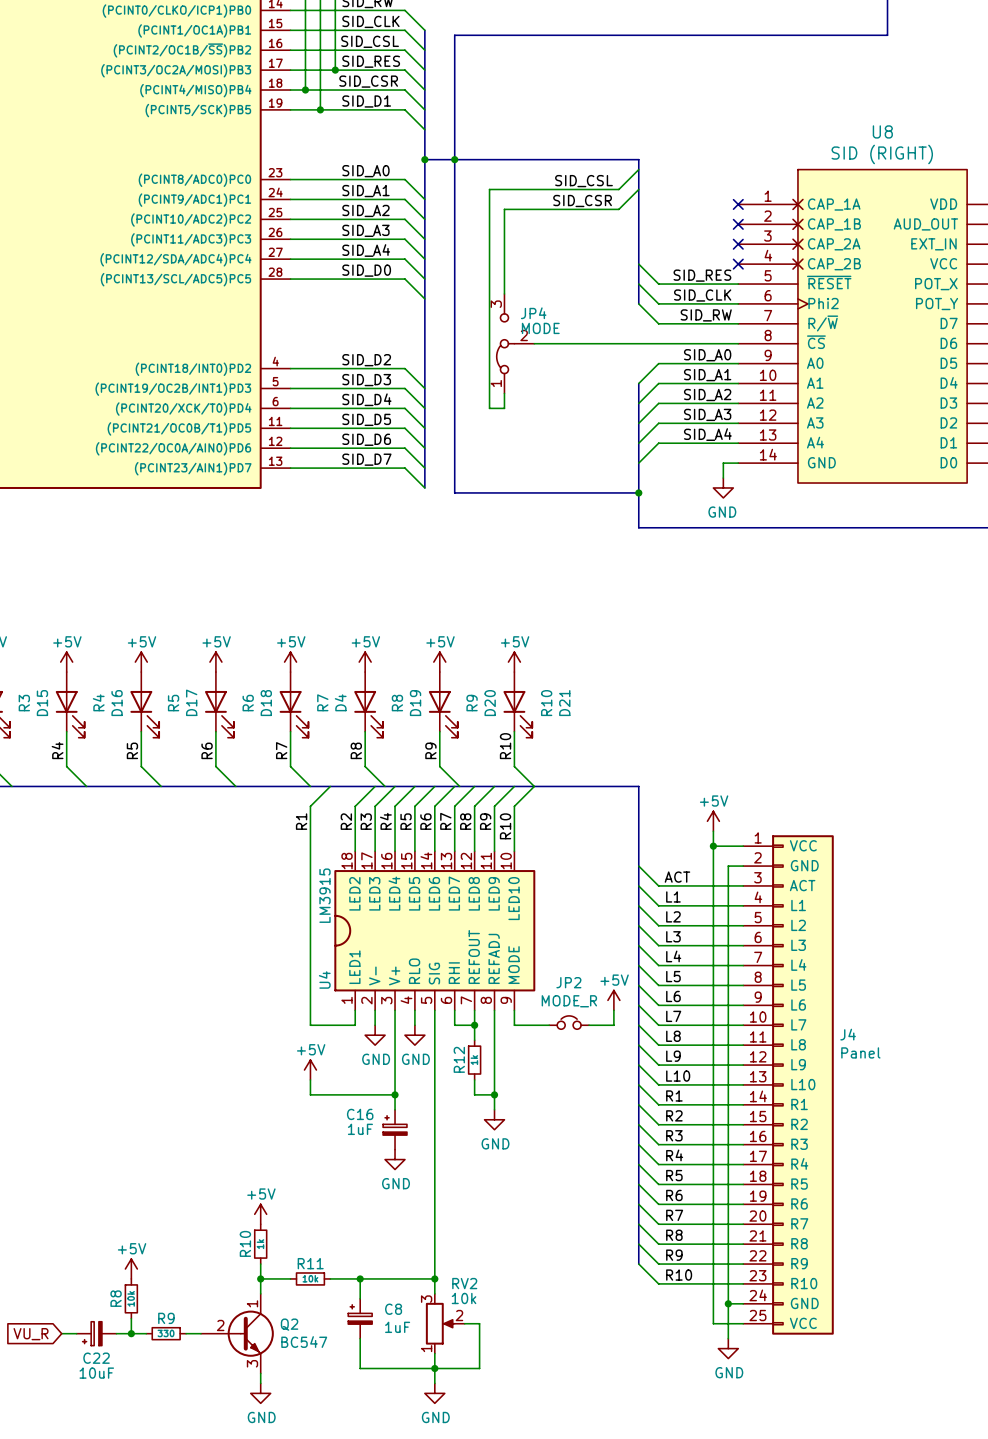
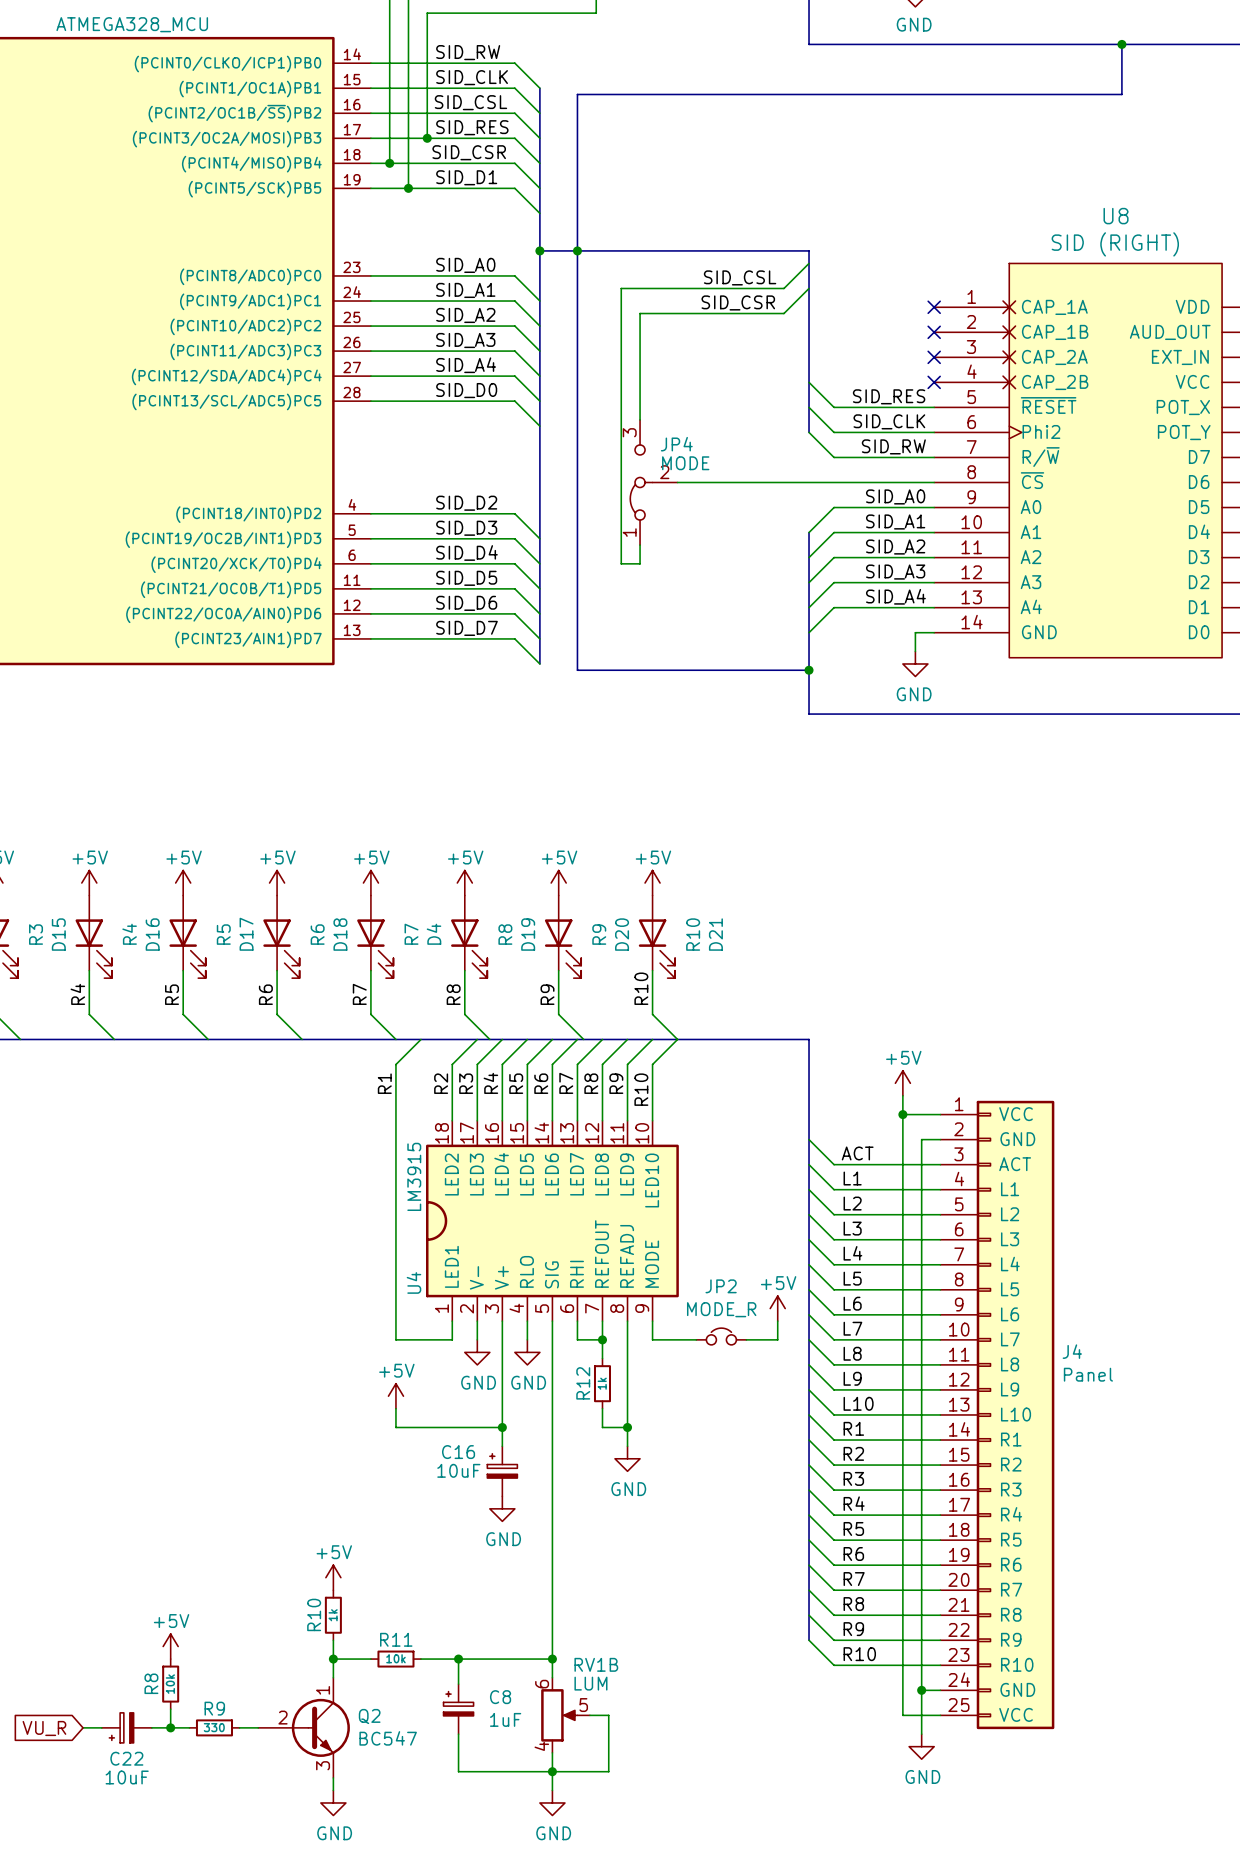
C16 value: 1uF (360, 1129) -> 10uF (458, 1470)
RV2 name: RV2 (464, 1283) -> RV1B (596, 1664)
RV2 value: 10k (464, 1298) -> LUM (590, 1683)
RV2 pin number: 3 (426, 1299) -> 6 (542, 1684)
RV2 pin number: 2 (459, 1315) -> 5 (583, 1705)
RV2 pin number: 1 (426, 1348) -> 4 (541, 1746)

